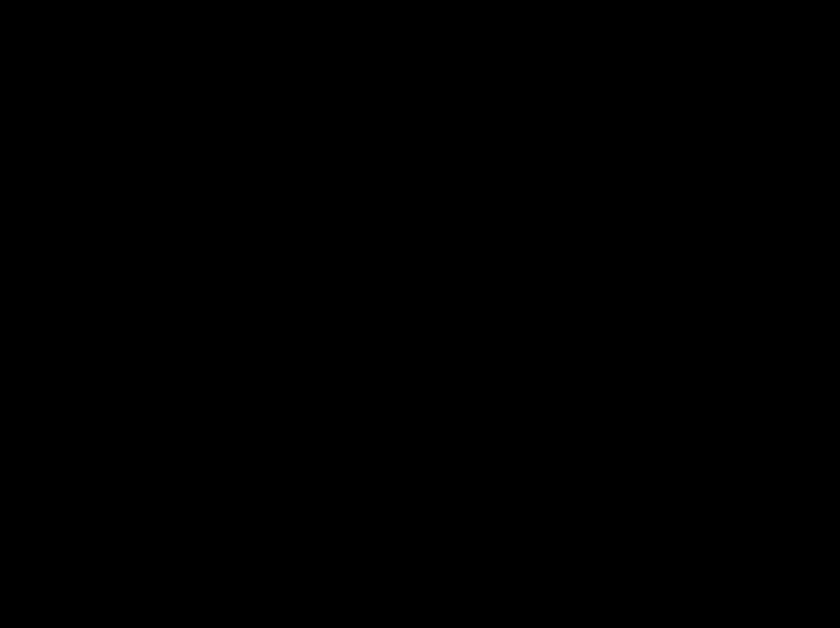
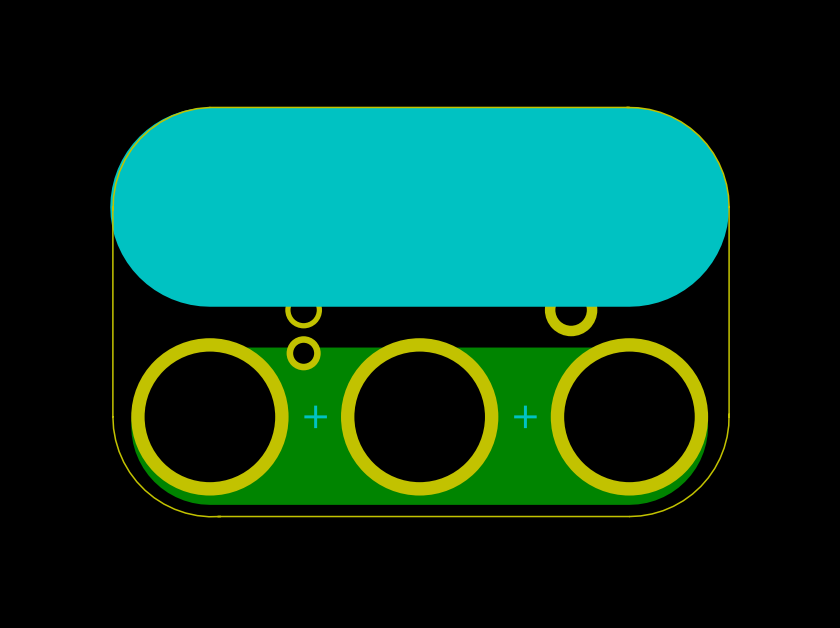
part: none -> (419, 312)

